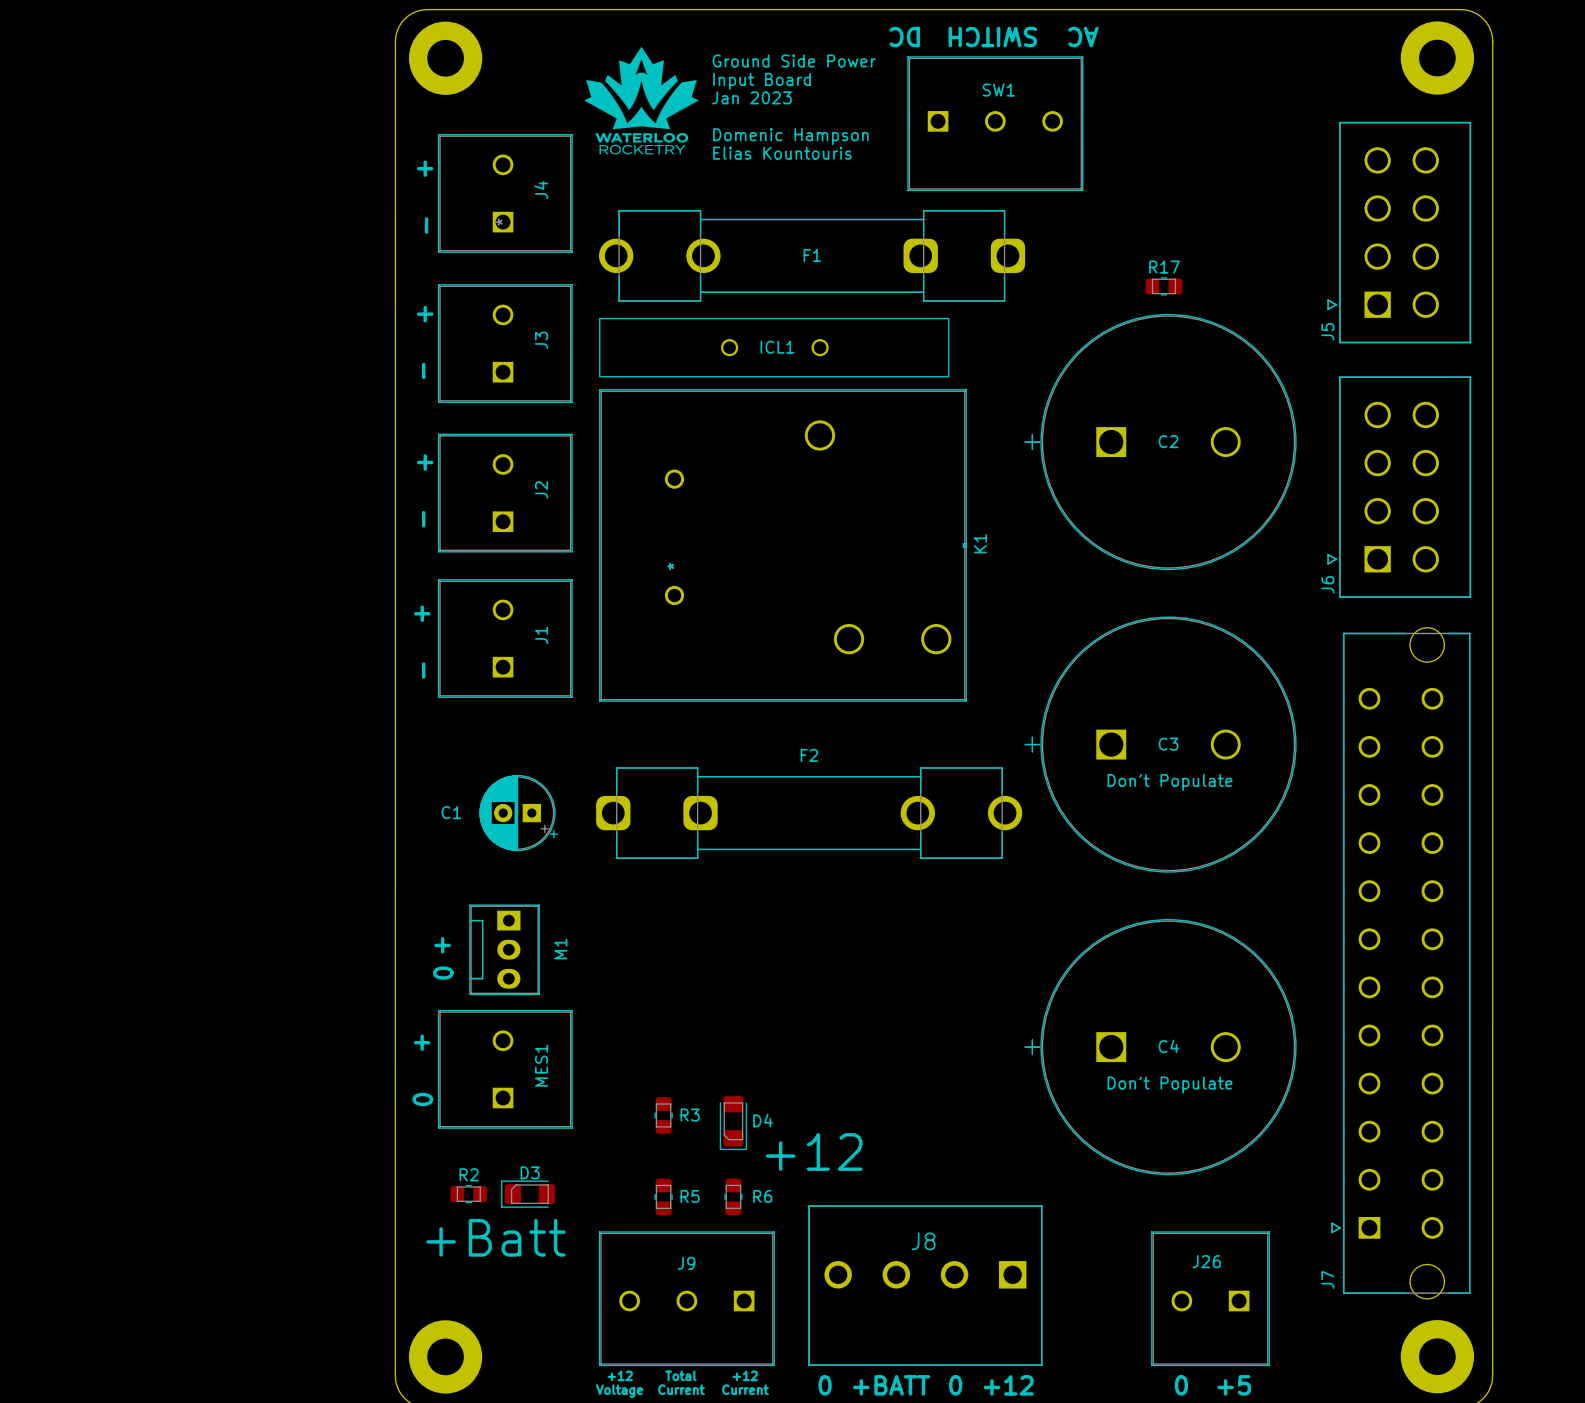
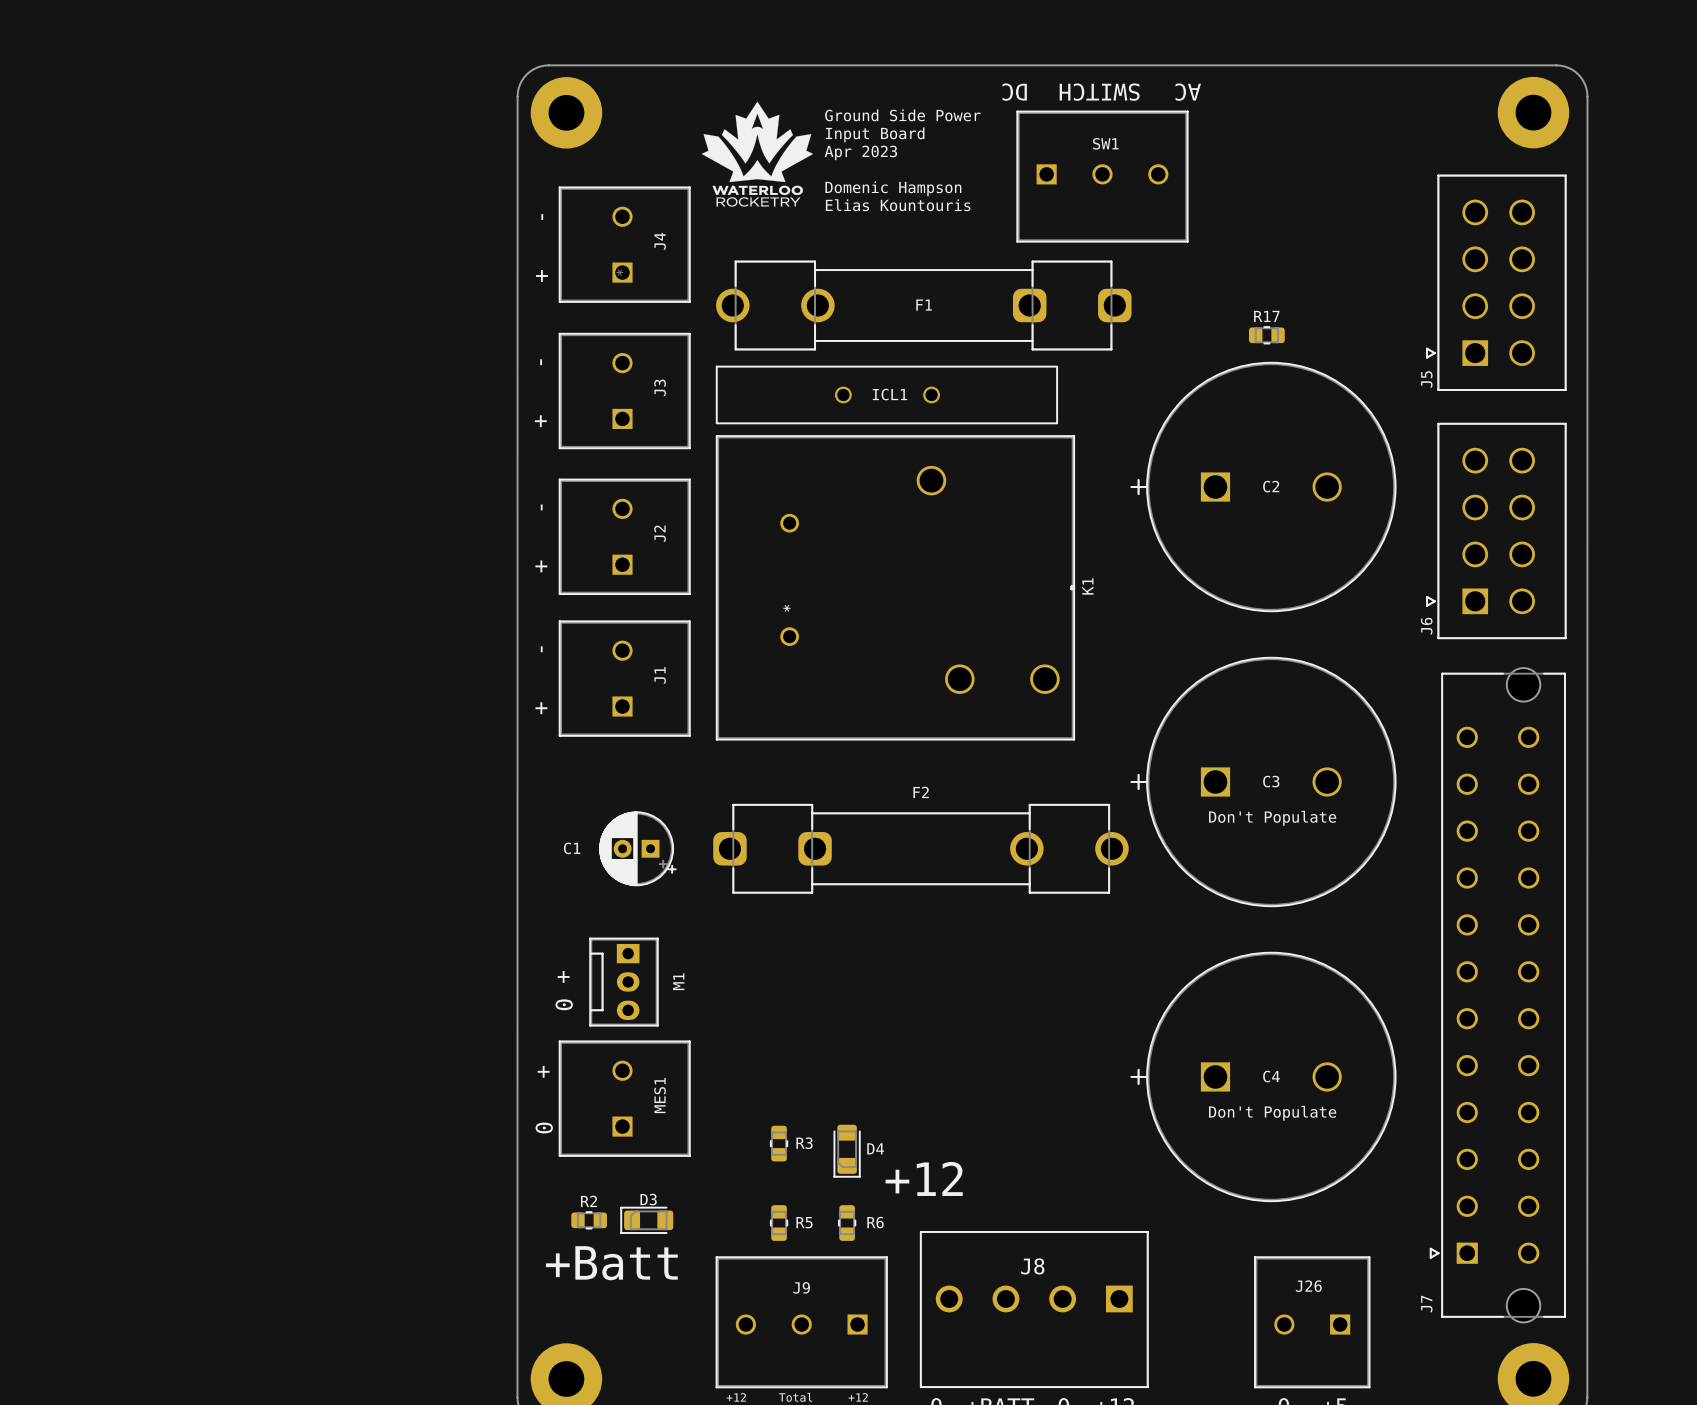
text: Jan 2023 (751, 97) -> Apr 2023 (860, 152)
text: + (425, 168) -> - (542, 217)
text: - (426, 225) -> + (541, 275)
text: + (425, 314) -> - (541, 362)
text: - (423, 370) -> + (540, 421)
text: + (425, 462) -> - (541, 507)
text: - (423, 519) -> + (541, 566)
text: + (422, 613) -> - (541, 649)
text: - (423, 670) -> + (541, 708)

